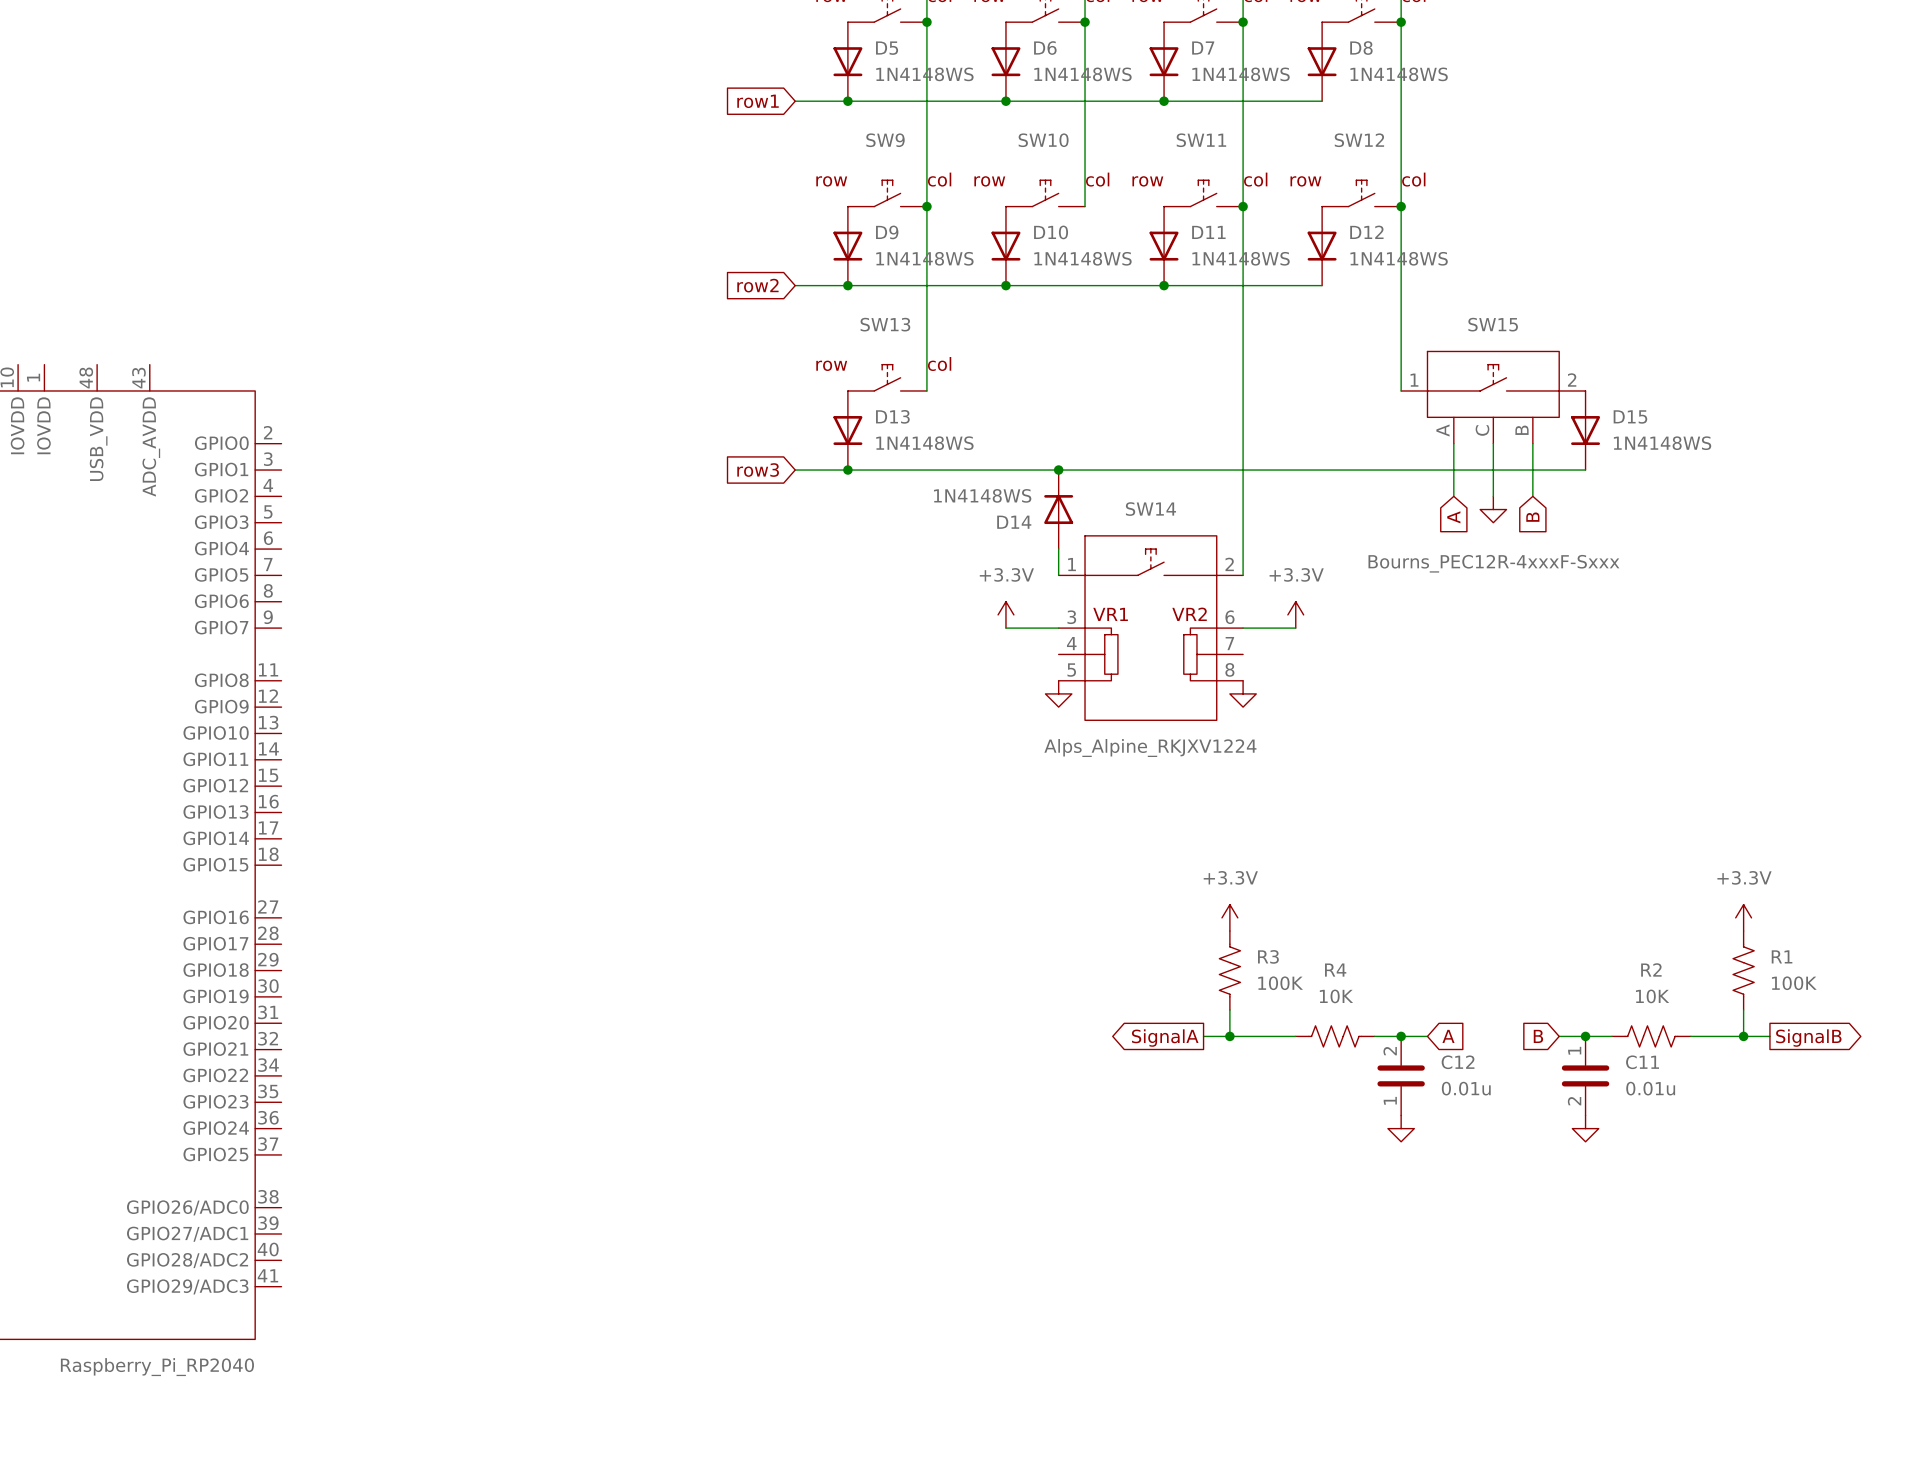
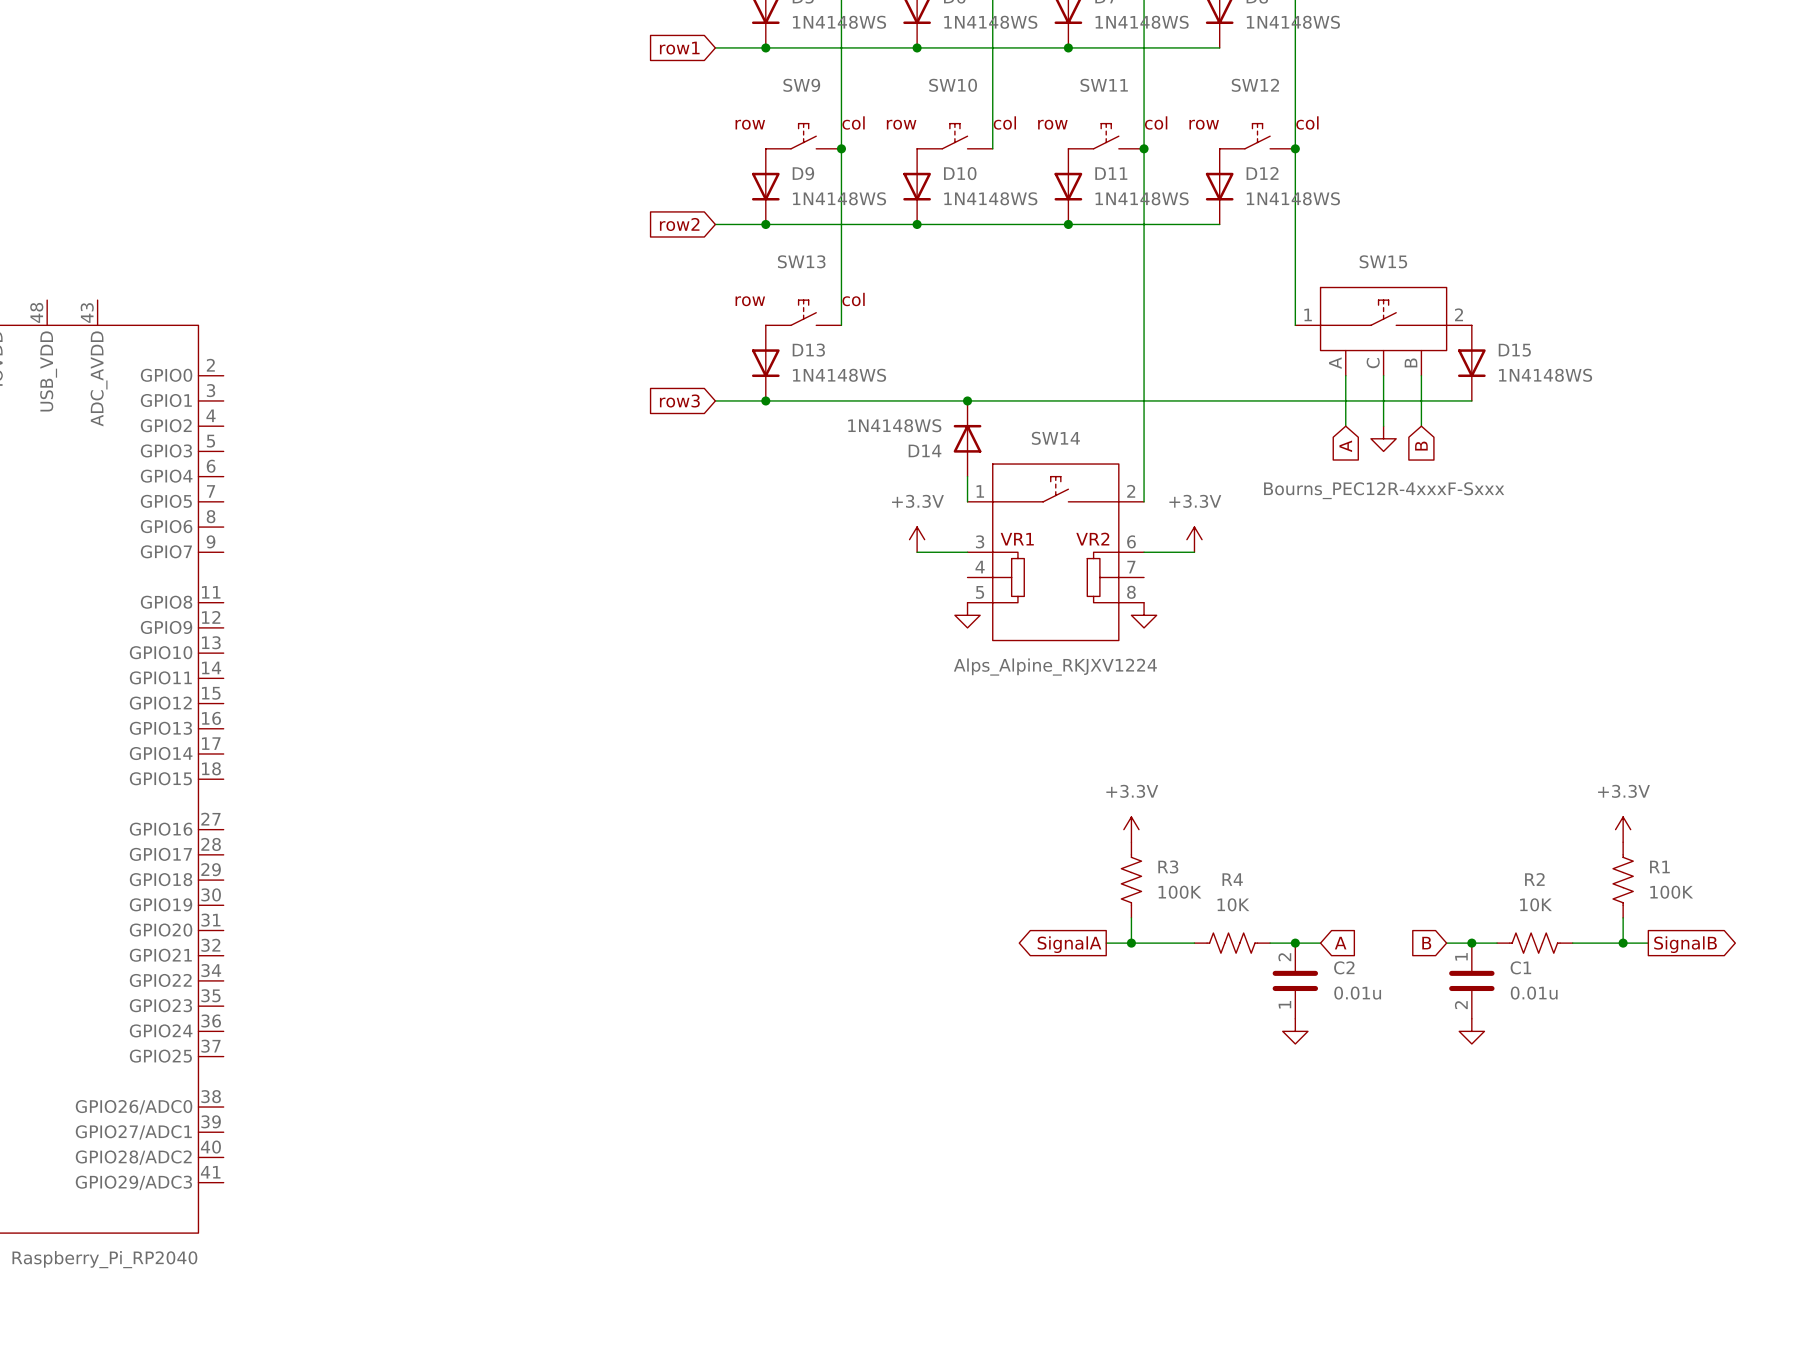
C12 name: C12 (1458, 1062) -> C2 (1344, 967)
C11 name: C11 (1642, 1062) -> C1 (1520, 967)

